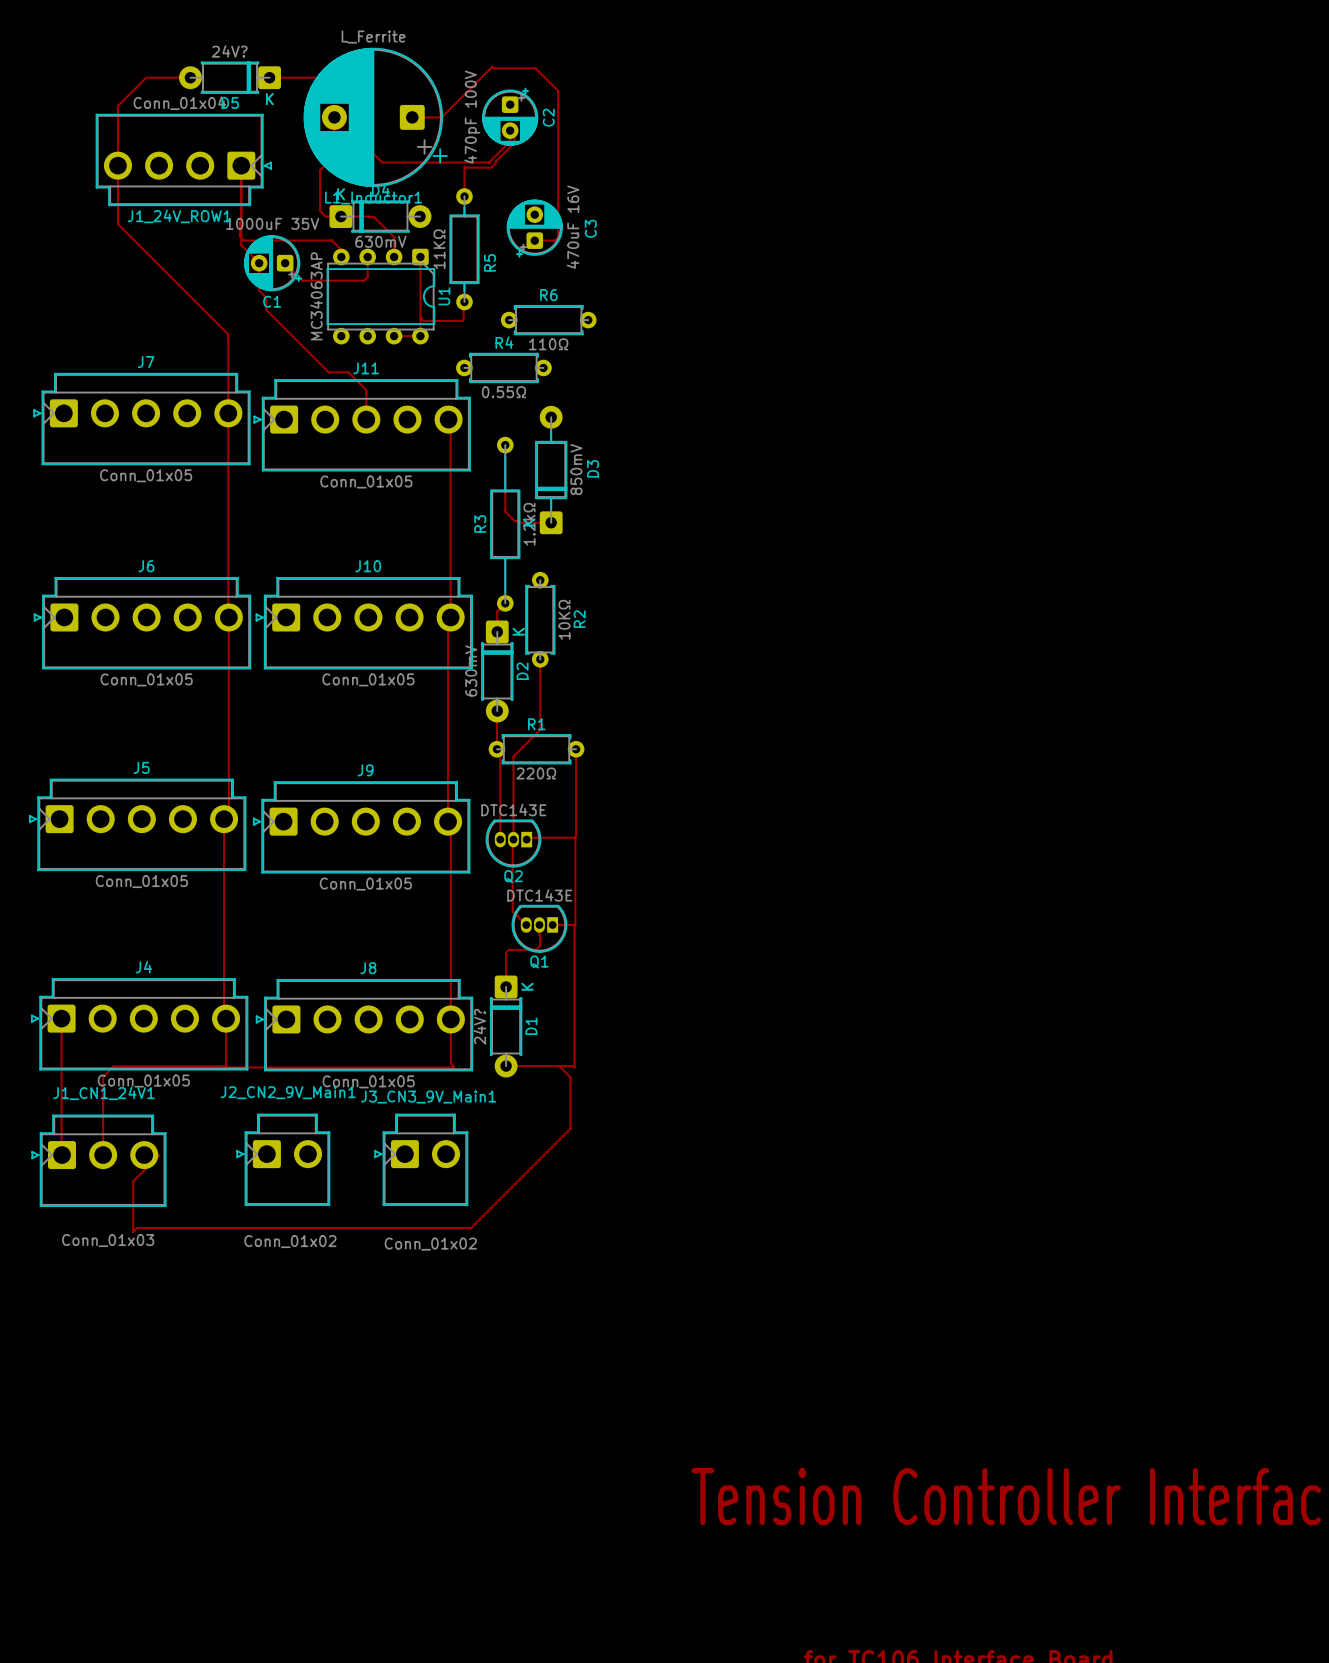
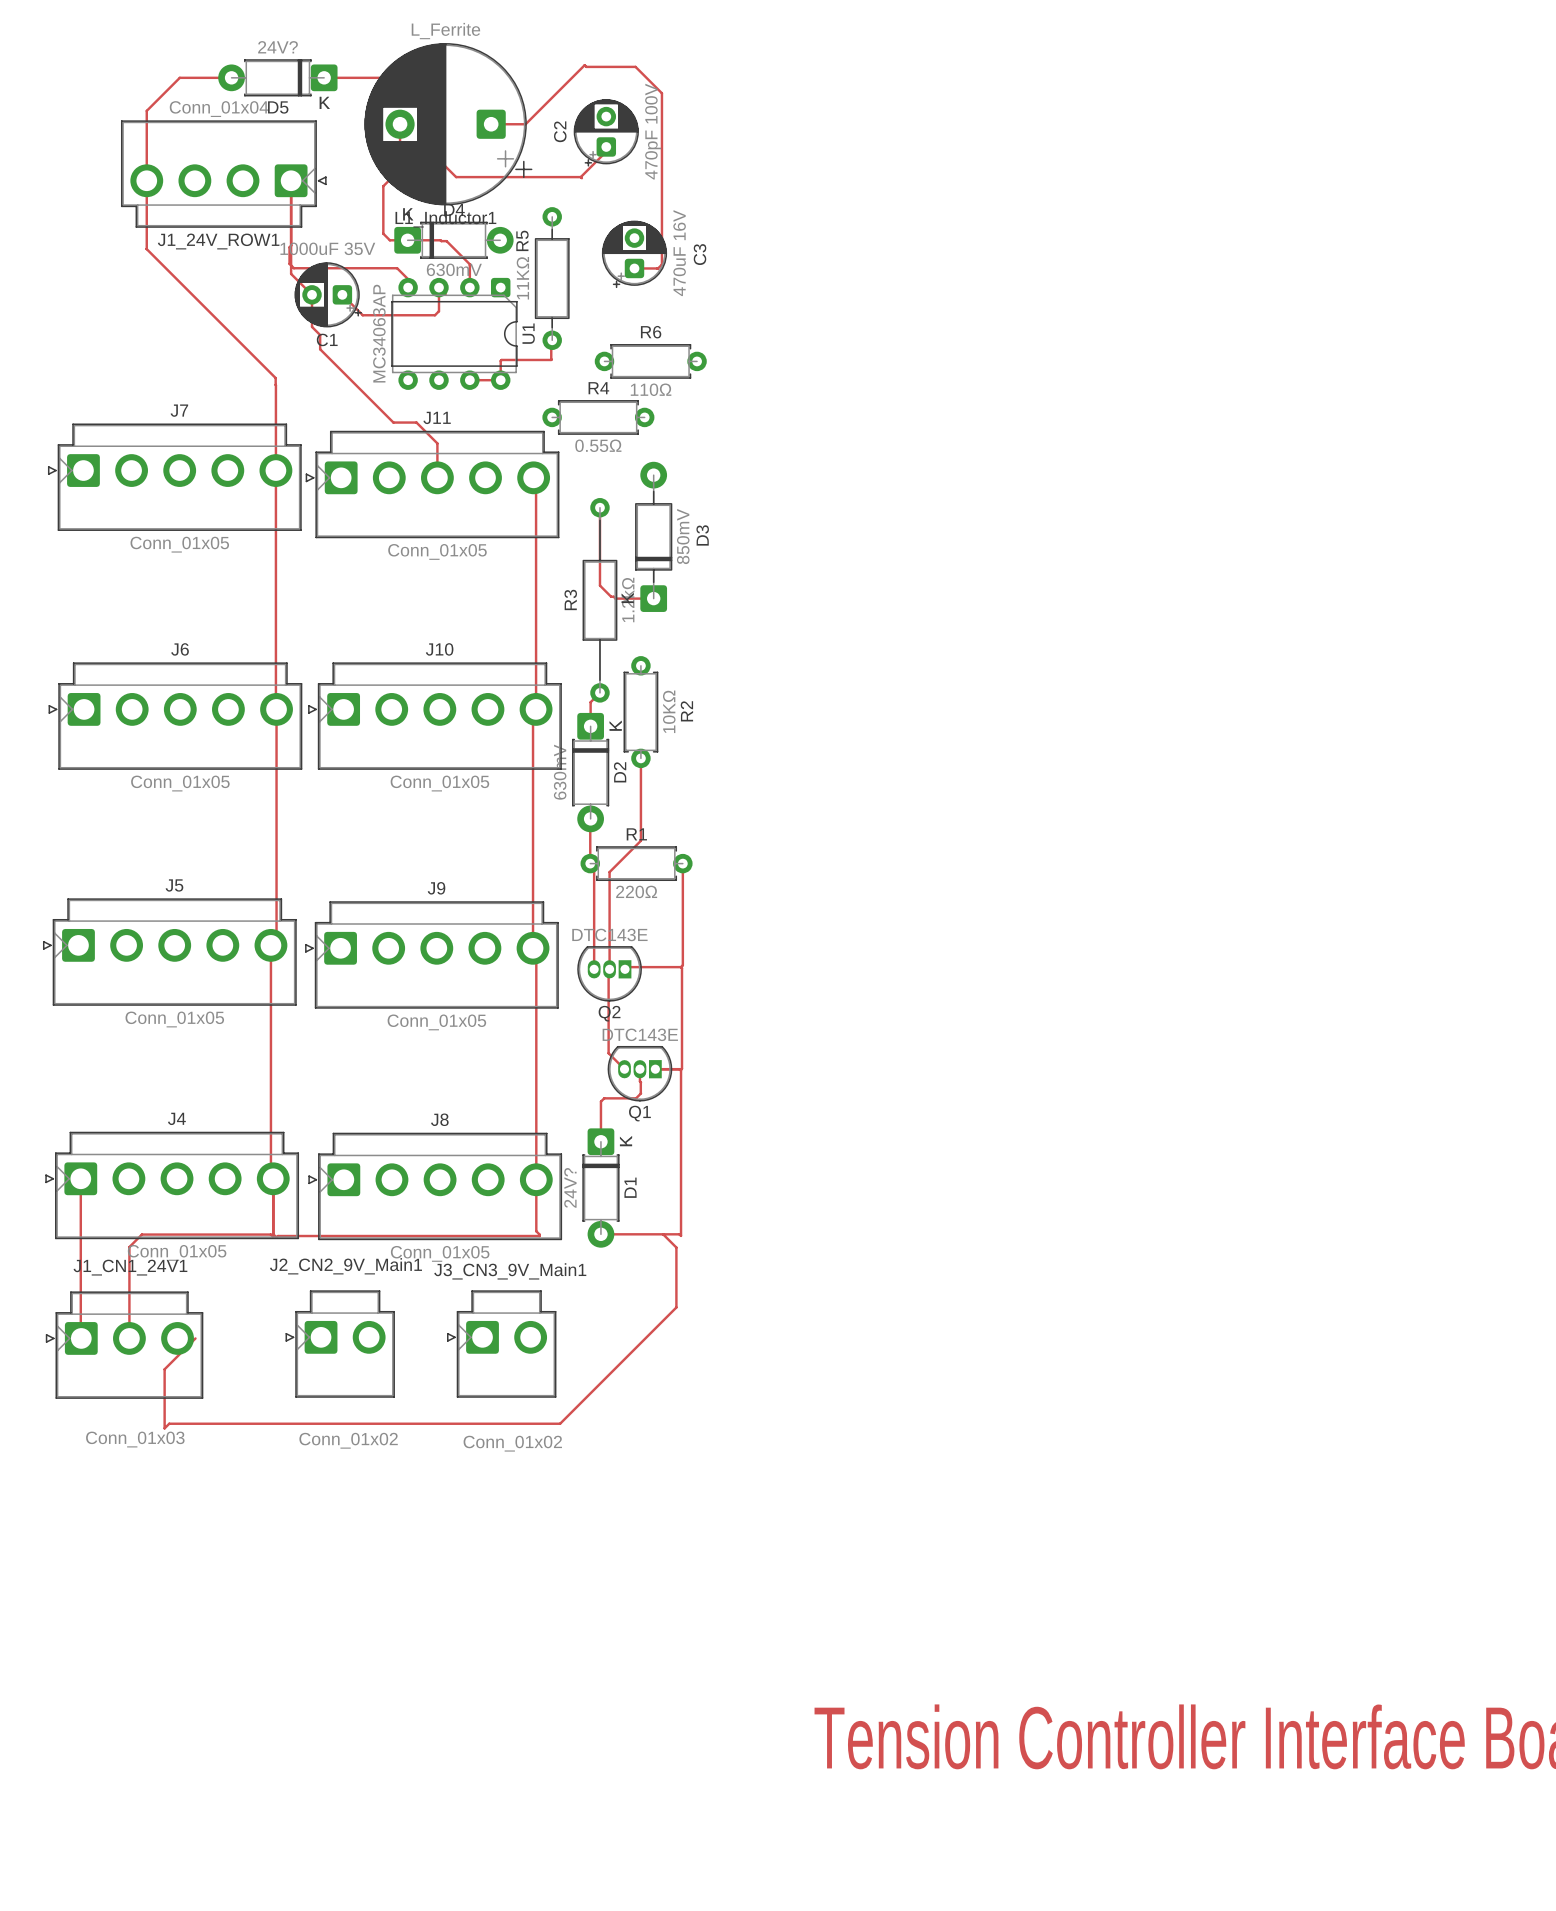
C2 rotation: 0° (510, 116) -> 180° (606, 132)
top track: (511, 128) (514, 131) (514, 142) (491, 167) (464, 167) (464, 196) -> none
top track: (420, 257) (421, 318) (423, 320) (462, 320) (463, 318) -> (501, 359) (551, 359)
R5 name position: R5 (490, 262) -> R5 (522, 240)

